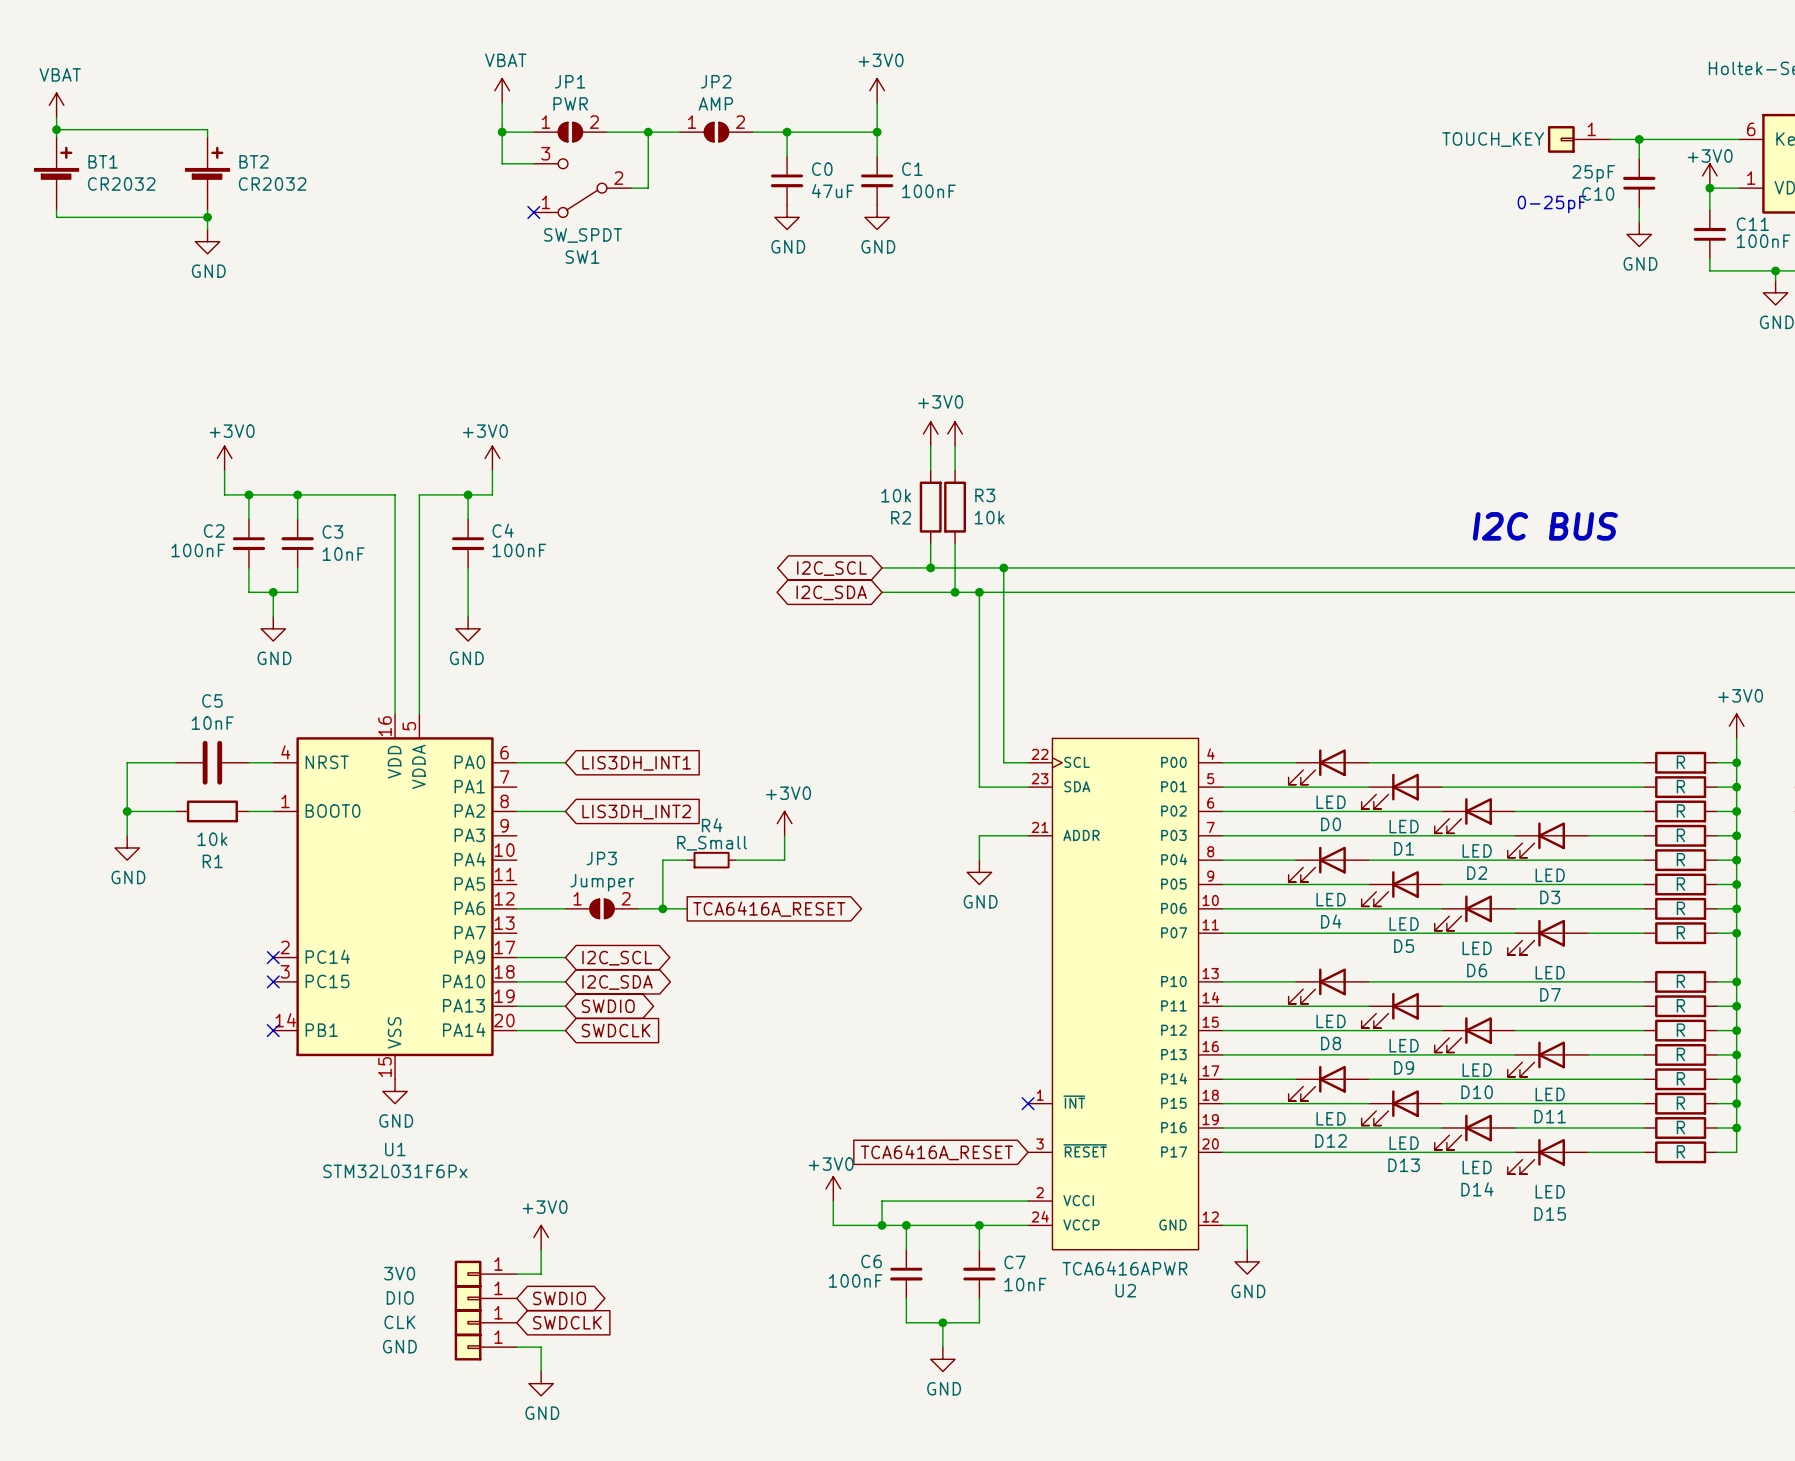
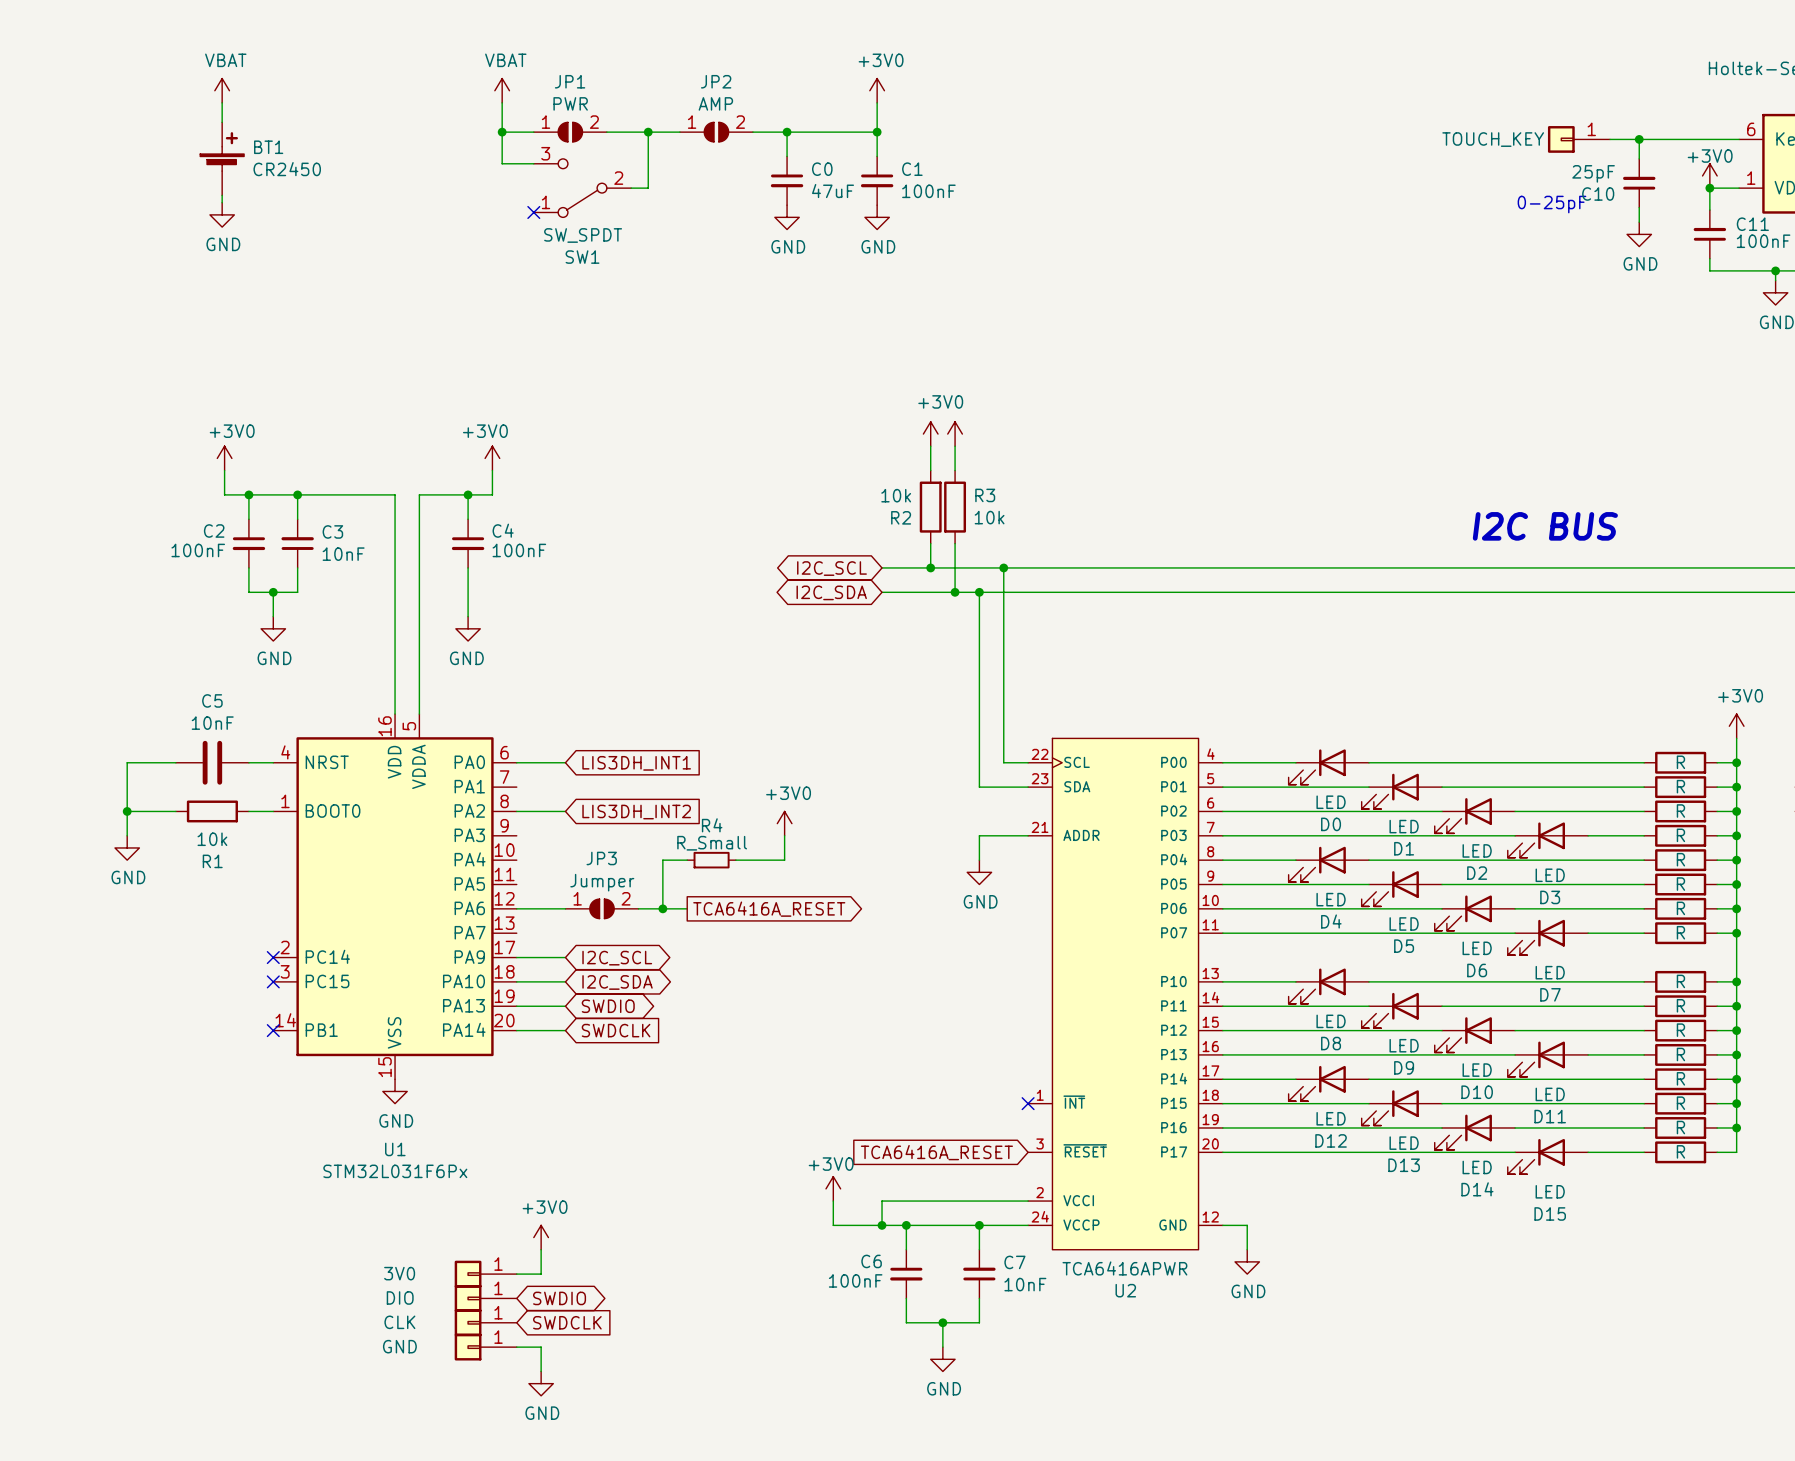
power symbol position: VBAT (56, 105) -> VBAT (222, 90)
wire: (56, 117) (56, 136) -> none
wire: (56, 129) (207, 129) (207, 136) -> none
junction: (56, 129) -> none
BT1 position: (56, 173) -> (222, 158)
BT2: CR2032 (207, 173) -> none
BT1 value: CR2032 (121, 184) -> CR2450 (287, 169)
wire: none -> (222, 195) (222, 202)
wire: (56, 210) (56, 217) (207, 217) -> none
wire: (207, 210) (207, 229) -> (222, 102) (222, 122)
junction: (207, 217) -> none
power symbol position: GND (207, 241) -> GND (222, 214)

